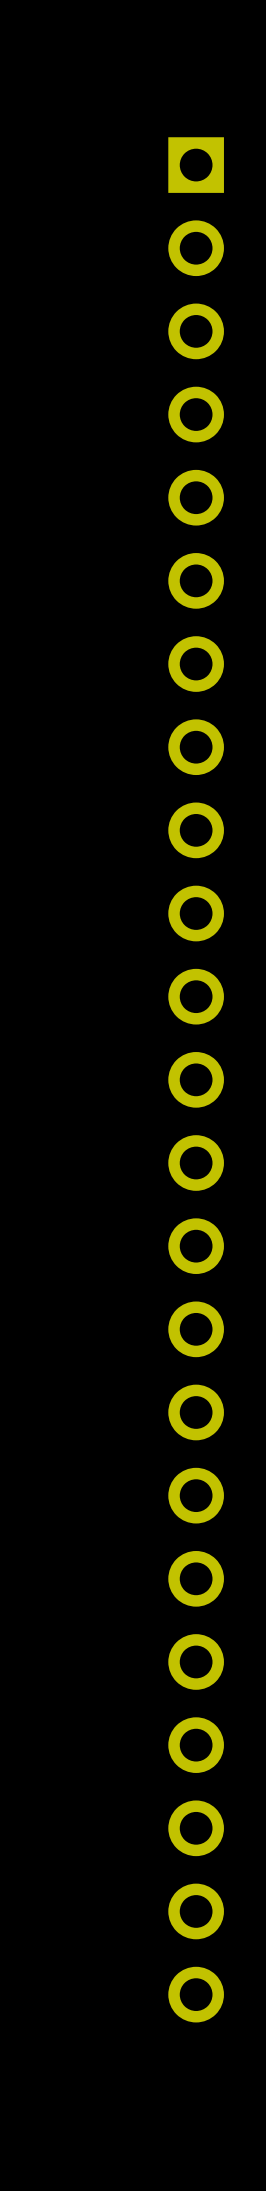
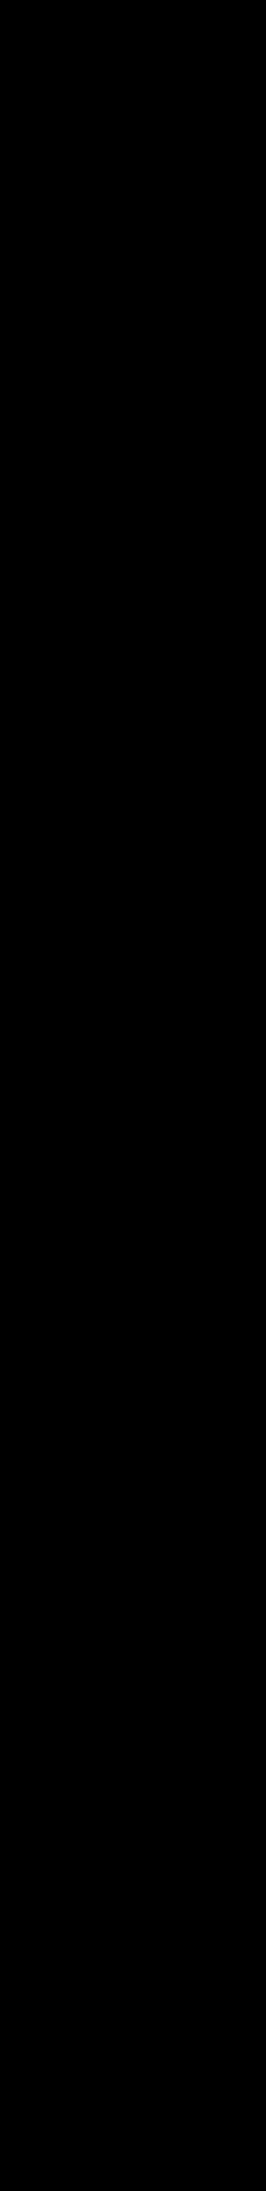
part: (196, 1079) -> none

